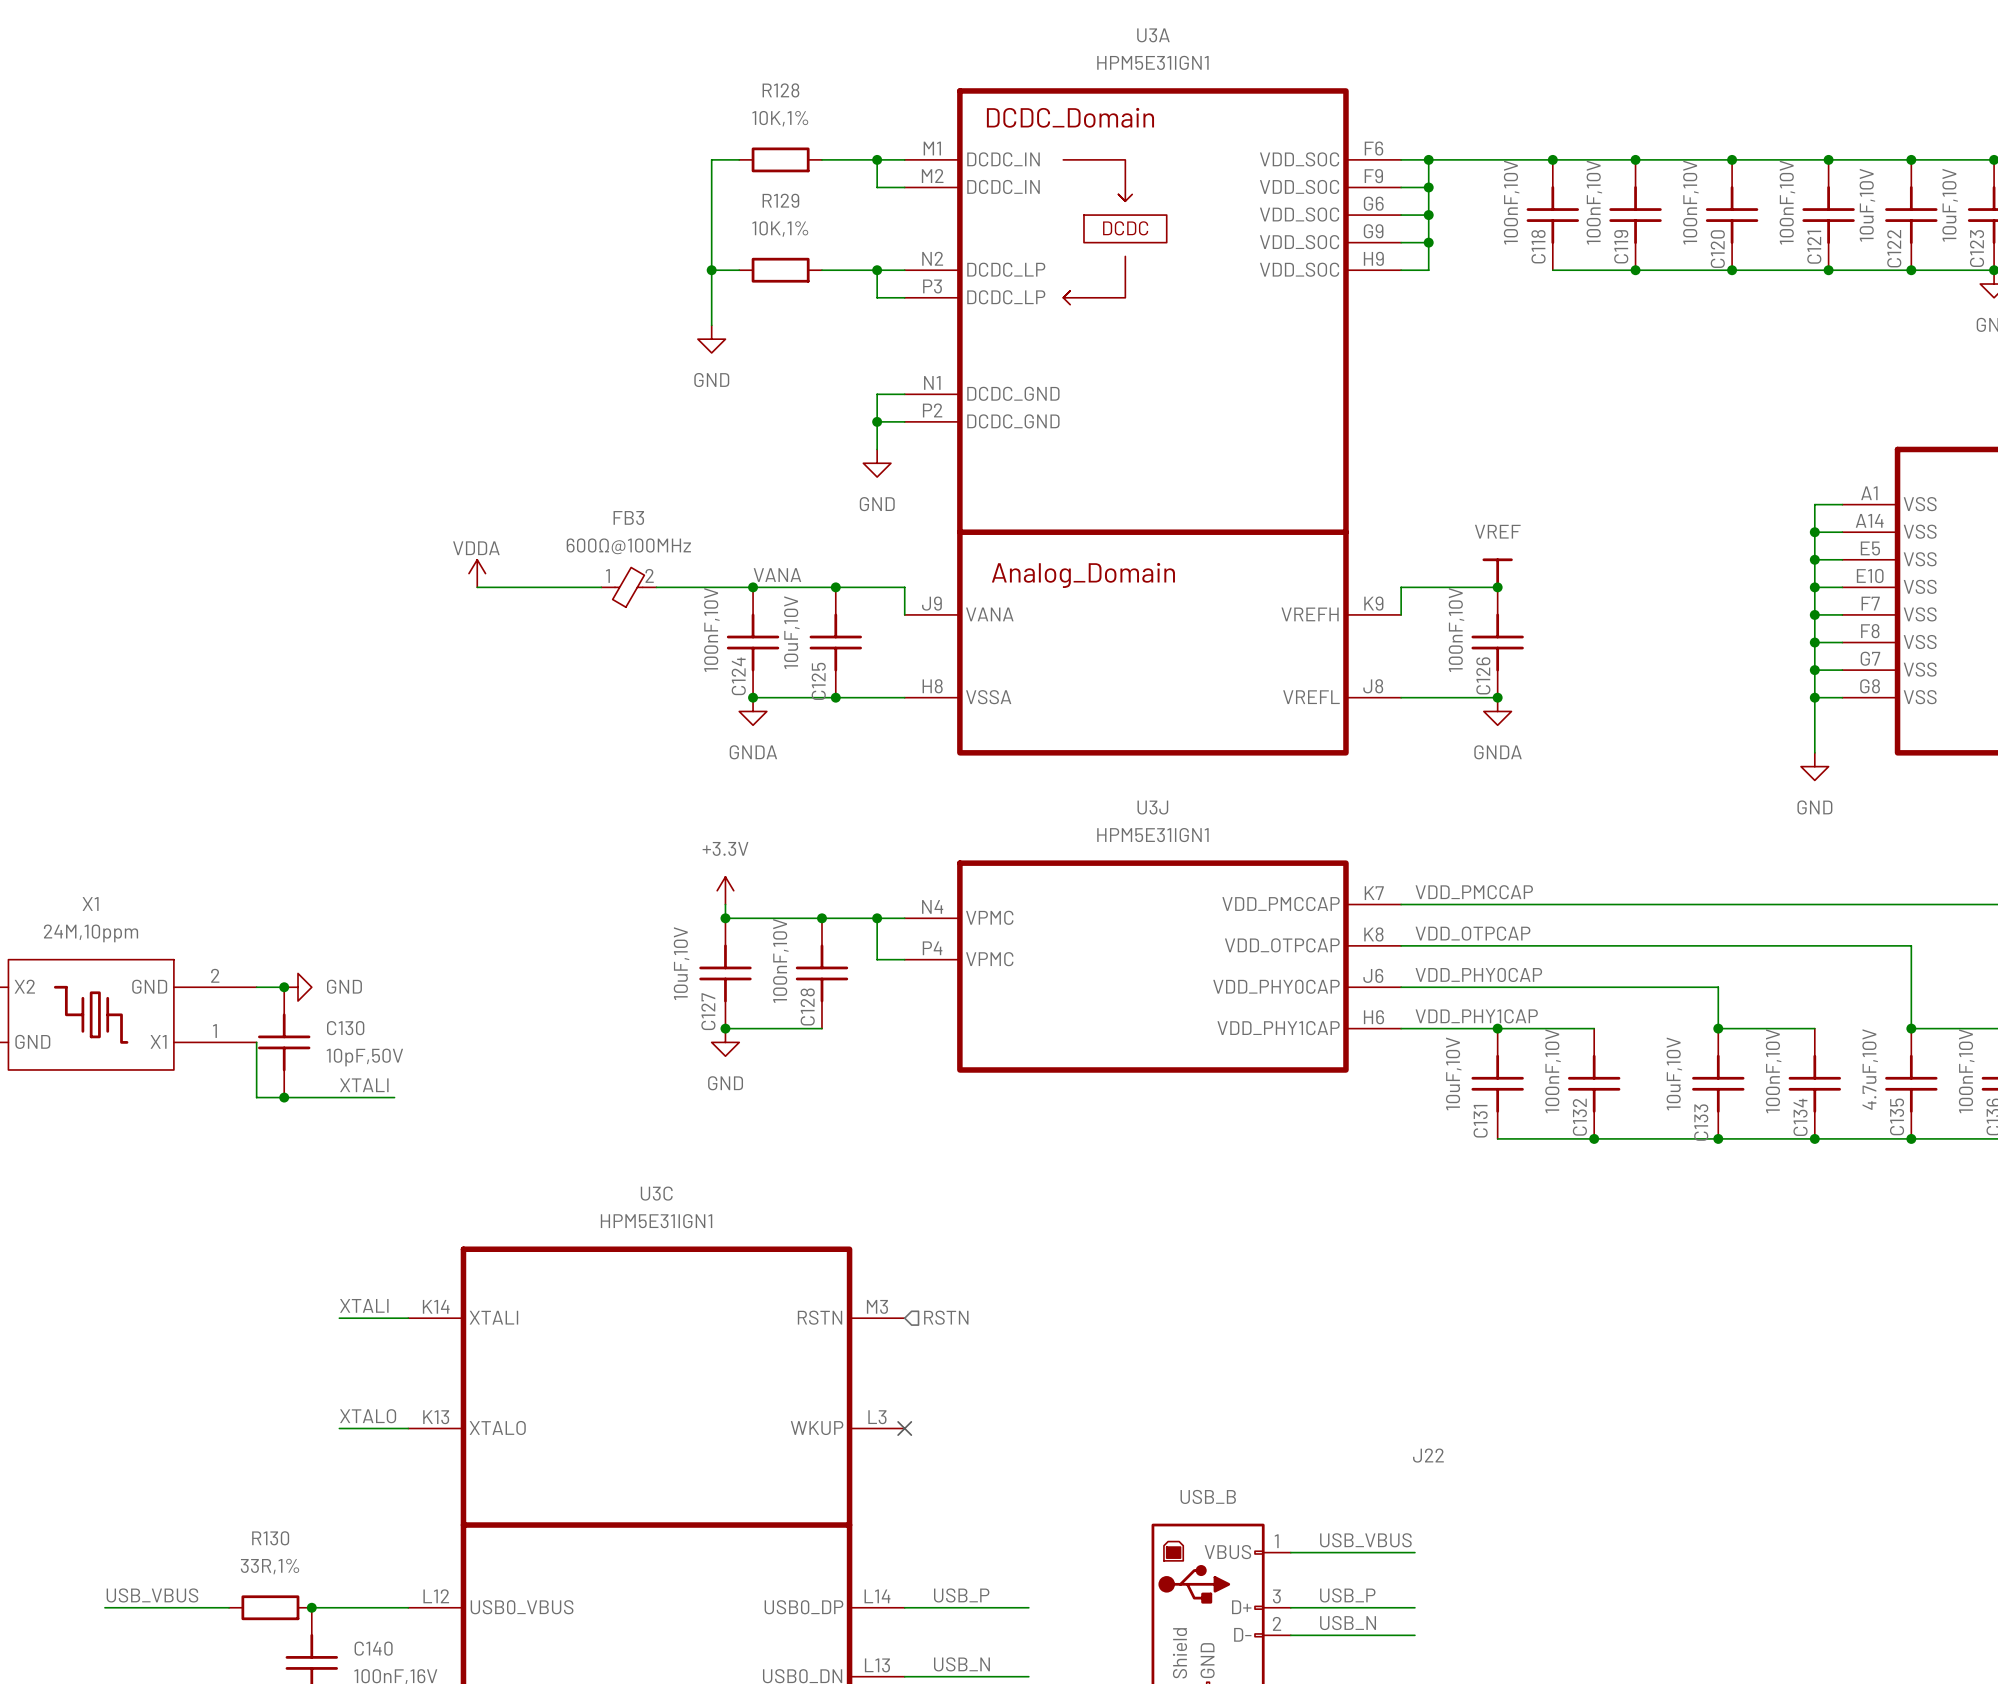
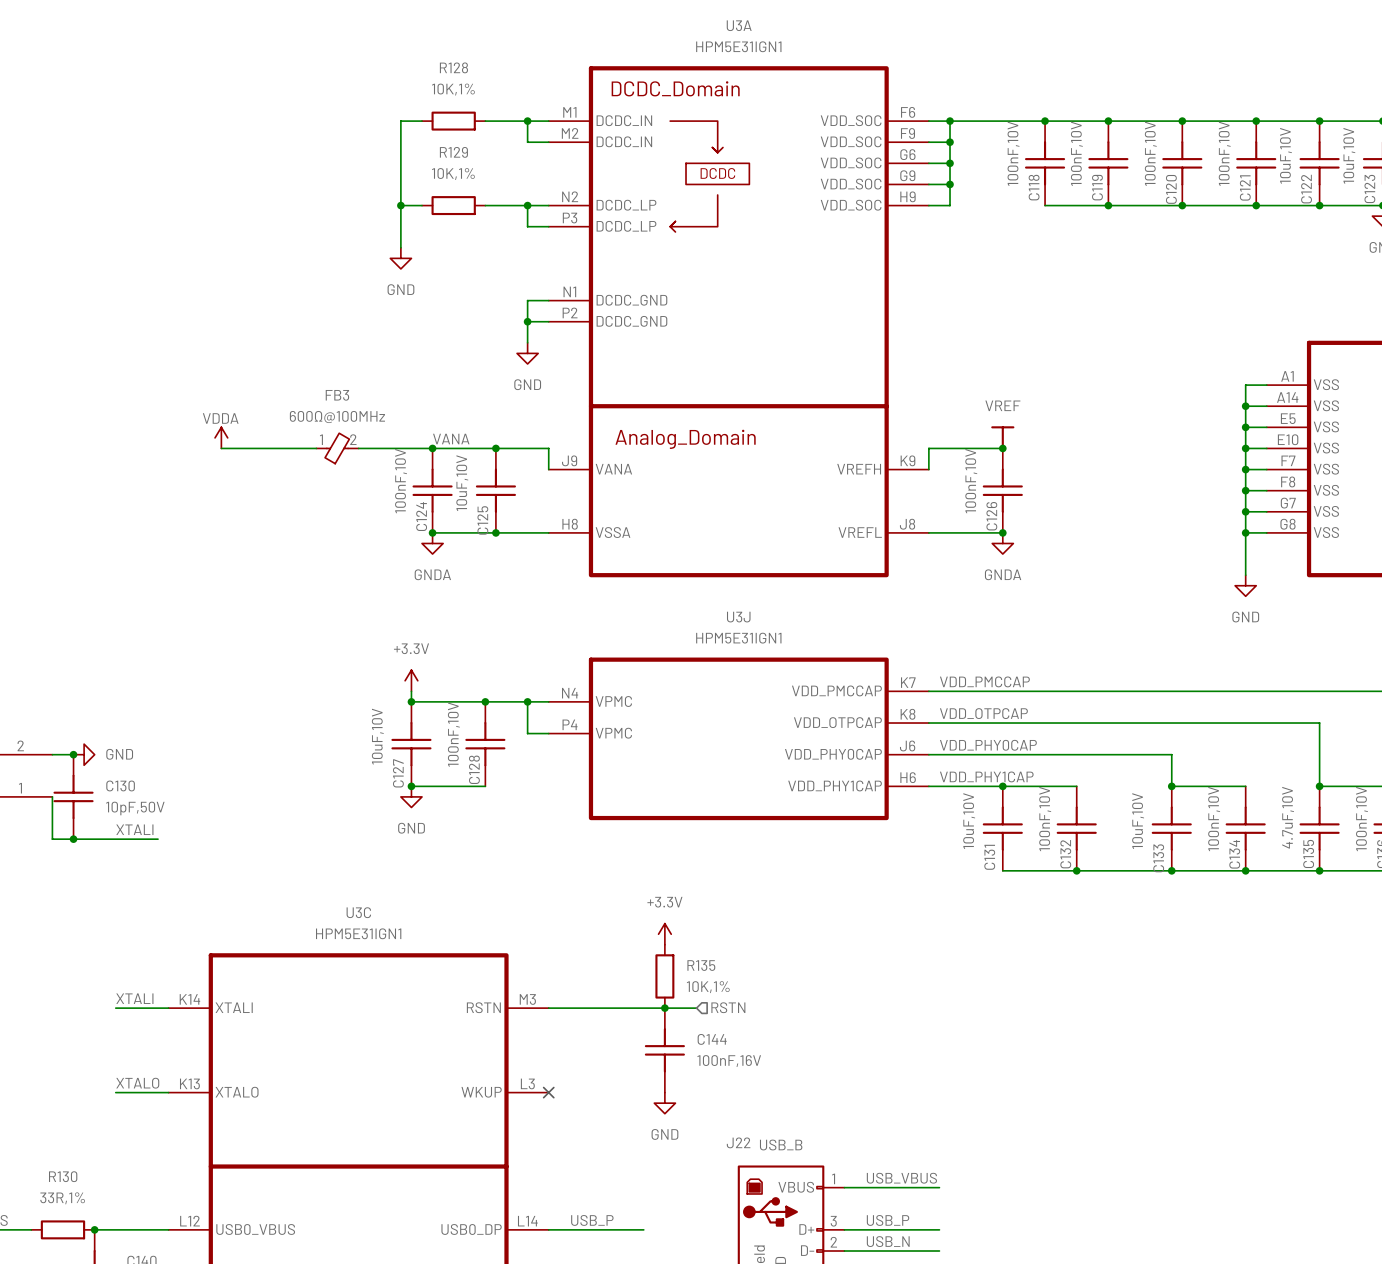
power symbol: none -> +3.3V (664, 934)
R135: none -> 10K,1% (664, 976)
hierarchical label position: RSTN (946, 1317) -> RSTN (728, 1007)
wire: none -> (548, 1008) (696, 1008)
junction: none -> (664, 1008)
C144: none -> 100nF,16V (664, 1050)
power symbol: none -> GND (664, 1103)
J22 name position: J22 (1428, 1455) -> J22 (738, 1142)

